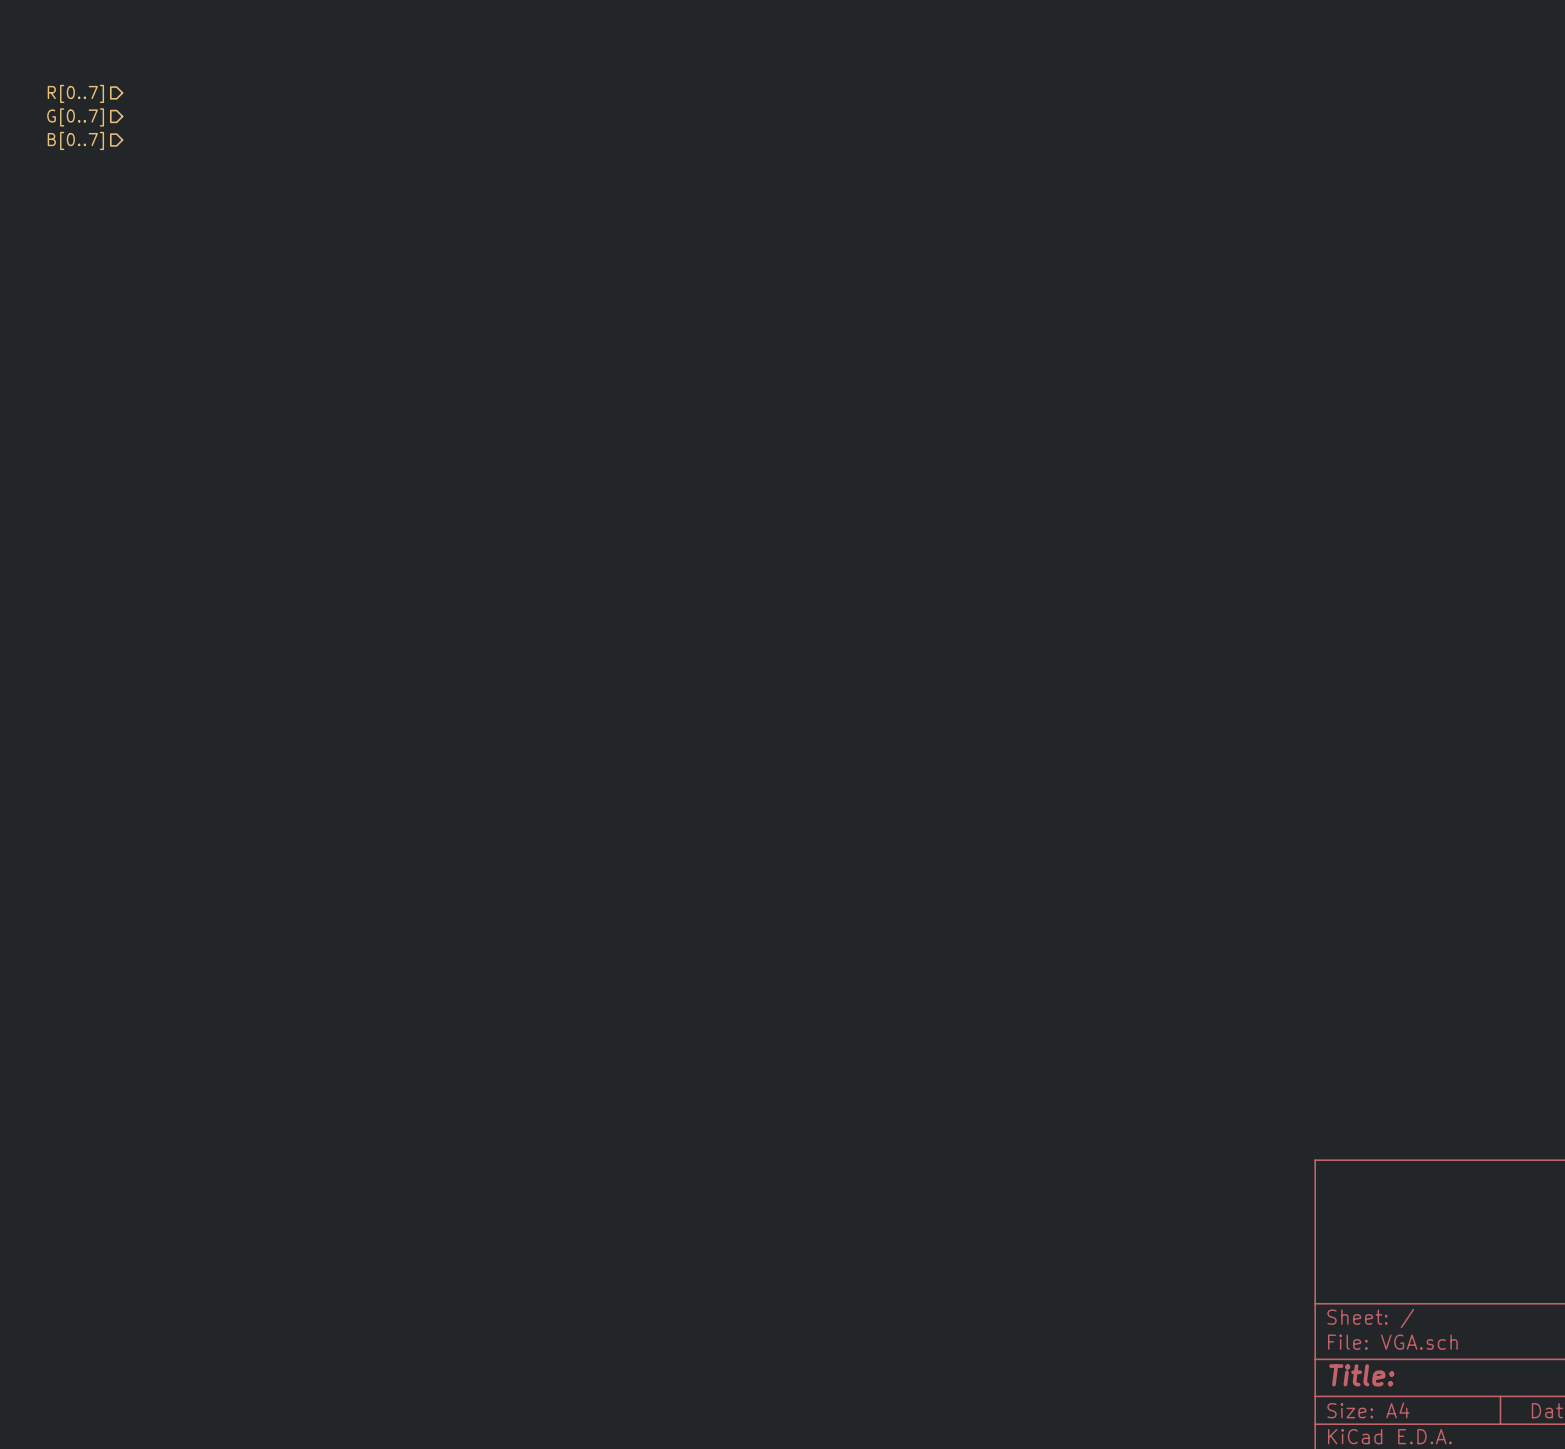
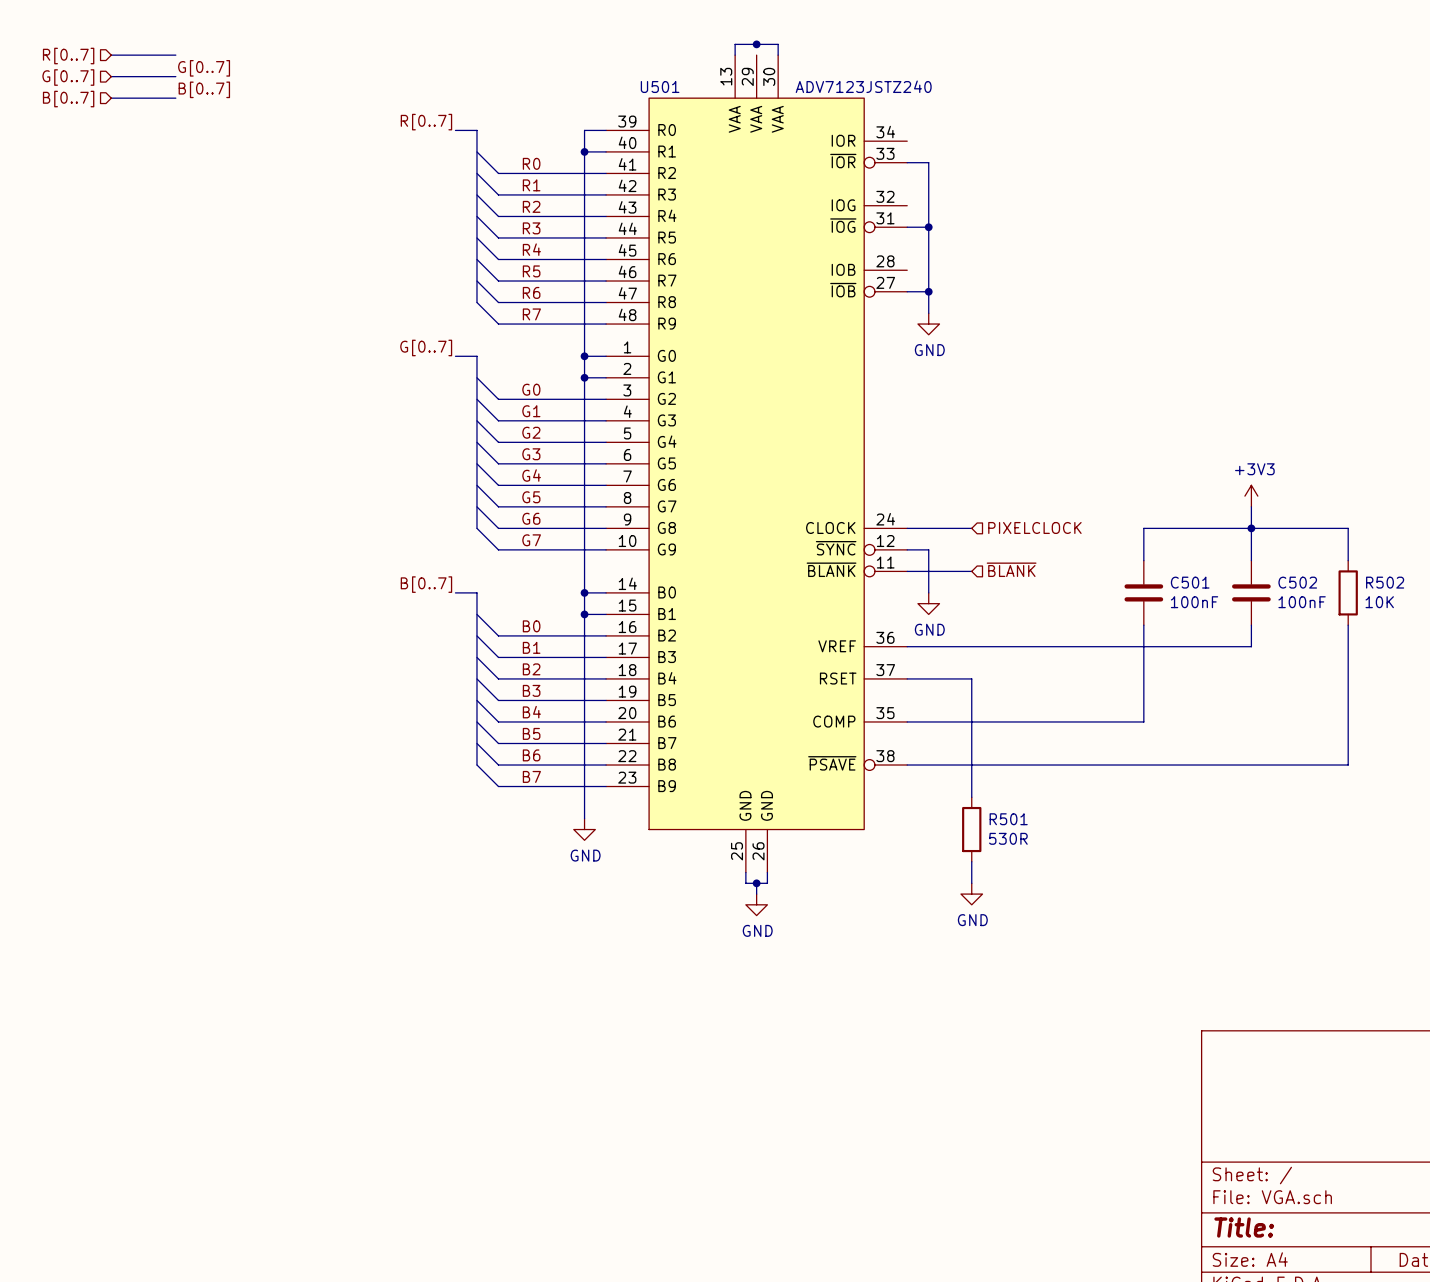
junction: none -> (756, 44)
bus: none -> (111, 55) (175, 55)
wire: none -> (735, 55) (735, 44) (778, 44) (778, 55)
label: none -> G[0..7] (204, 68)
bus: none -> (111, 76) (175, 76)
label: none -> B[0..7] (204, 89)
bus: none -> (111, 98) (175, 98)
label: none -> R[0..7] (426, 122)
bus: none -> (455, 130) (476, 130) (476, 302)
wire: none -> (606, 130) (584, 130) (584, 818)
wire: none -> (476, 151) (498, 173) (606, 173)
wire: none -> (584, 151) (606, 151)
junction: none -> (584, 151)
wire: none -> (907, 162) (928, 162) (928, 313)
label: none -> R0 (531, 163)
wire: none -> (476, 173) (498, 194) (606, 194)
label: none -> R1 (531, 185)
wire: none -> (476, 194) (498, 216) (606, 216)
label: none -> R2 (531, 206)
wire: none -> (476, 216) (498, 237) (606, 237)
wire: none -> (907, 227) (928, 227)
junction: none -> (928, 227)
label: none -> R3 (531, 228)
wire: none -> (476, 237) (498, 259) (606, 259)
label: none -> R4 (531, 249)
wire: none -> (476, 259) (498, 281) (606, 281)
label: none -> R5 (531, 271)
wire: none -> (476, 281) (498, 302) (606, 302)
wire: none -> (907, 291) (928, 291)
junction: none -> (928, 291)
label: none -> R6 (531, 292)
wire: none -> (476, 302) (498, 324) (606, 324)
label: none -> R7 (531, 314)
power symbol: none -> GND (928, 324)
label: none -> G[0..7] (426, 347)
bus: none -> (455, 356) (476, 356) (476, 528)
wire: none -> (584, 356) (606, 356)
junction: none -> (584, 356)
wire: none -> (476, 377) (498, 399) (606, 399)
wire: none -> (584, 377) (606, 377)
junction: none -> (584, 377)
label: none -> G0 (531, 389)
wire: none -> (476, 399) (498, 420) (606, 420)
label: none -> G1 (531, 411)
wire: none -> (476, 420) (498, 442) (606, 442)
label: none -> G2 (531, 432)
wire: none -> (476, 442) (498, 463) (606, 463)
label: none -> G3 (531, 454)
wire: none -> (476, 463) (498, 485) (606, 485)
U501: none -> ADV7123JSTZ240 (756, 463)
label: none -> G4 (531, 475)
wire: none -> (476, 485) (498, 506) (606, 506)
power symbol: none -> +3V3 (1251, 496)
label: none -> G5 (531, 497)
wire: none -> (476, 506) (498, 528) (606, 528)
wire: none -> (1251, 506) (1251, 560)
label: none -> G6 (531, 518)
wire: none -> (476, 528) (498, 549) (606, 549)
wire: none -> (907, 528) (971, 528)
hierarchical label: none -> PIXELCLOCK (1034, 527)
junction: none -> (1251, 528)
label: none -> G7 (531, 540)
wire: none -> (907, 549) (928, 549) (928, 592)
wire: none -> (1143, 560) (1143, 528) (1348, 528) (1348, 560)
hierarchical label: none -> ~{BLANK} (1011, 569)
wire: none -> (907, 571) (971, 571)
label: none -> B[0..7] (426, 584)
bus: none -> (455, 592) (476, 592) (476, 765)
wire: none -> (584, 592) (606, 592)
junction: none -> (584, 592)
C501: none -> 100nF (1143, 592)
C502: none -> 100nF (1251, 592)
R502: none -> 10K (1348, 592)
power symbol: none -> GND (928, 603)
wire: none -> (476, 614) (498, 635) (606, 635)
wire: none -> (584, 614) (606, 614)
junction: none -> (584, 614)
wire: none -> (1143, 625) (1143, 721) (907, 721)
wire: none -> (1251, 625) (1251, 646) (907, 646)
wire: none -> (1348, 625) (1348, 765) (907, 765)
label: none -> B0 (531, 626)
wire: none -> (476, 635) (498, 657) (606, 657)
label: none -> B1 (531, 647)
wire: none -> (476, 657) (498, 678) (606, 678)
label: none -> B2 (531, 669)
wire: none -> (476, 678) (498, 700) (606, 700)
wire: none -> (907, 678) (971, 678) (971, 797)
label: none -> B3 (531, 690)
wire: none -> (476, 700) (498, 721) (606, 721)
label: none -> B4 (531, 712)
wire: none -> (476, 721) (498, 743) (606, 743)
label: none -> B5 (531, 733)
wire: none -> (476, 743) (498, 765) (606, 765)
label: none -> B6 (531, 755)
wire: none -> (476, 765) (498, 786) (606, 786)
label: none -> B7 (531, 776)
power symbol: none -> GND (584, 829)
R501: none -> 530R (971, 829)
wire: none -> (971, 861) (971, 883)
wire: none -> (745, 872) (745, 883) (767, 883) (767, 872)
wire: none -> (756, 883) (756, 894)
junction: none -> (756, 883)
power symbol: none -> GND (971, 894)
power symbol: none -> GND (756, 904)

